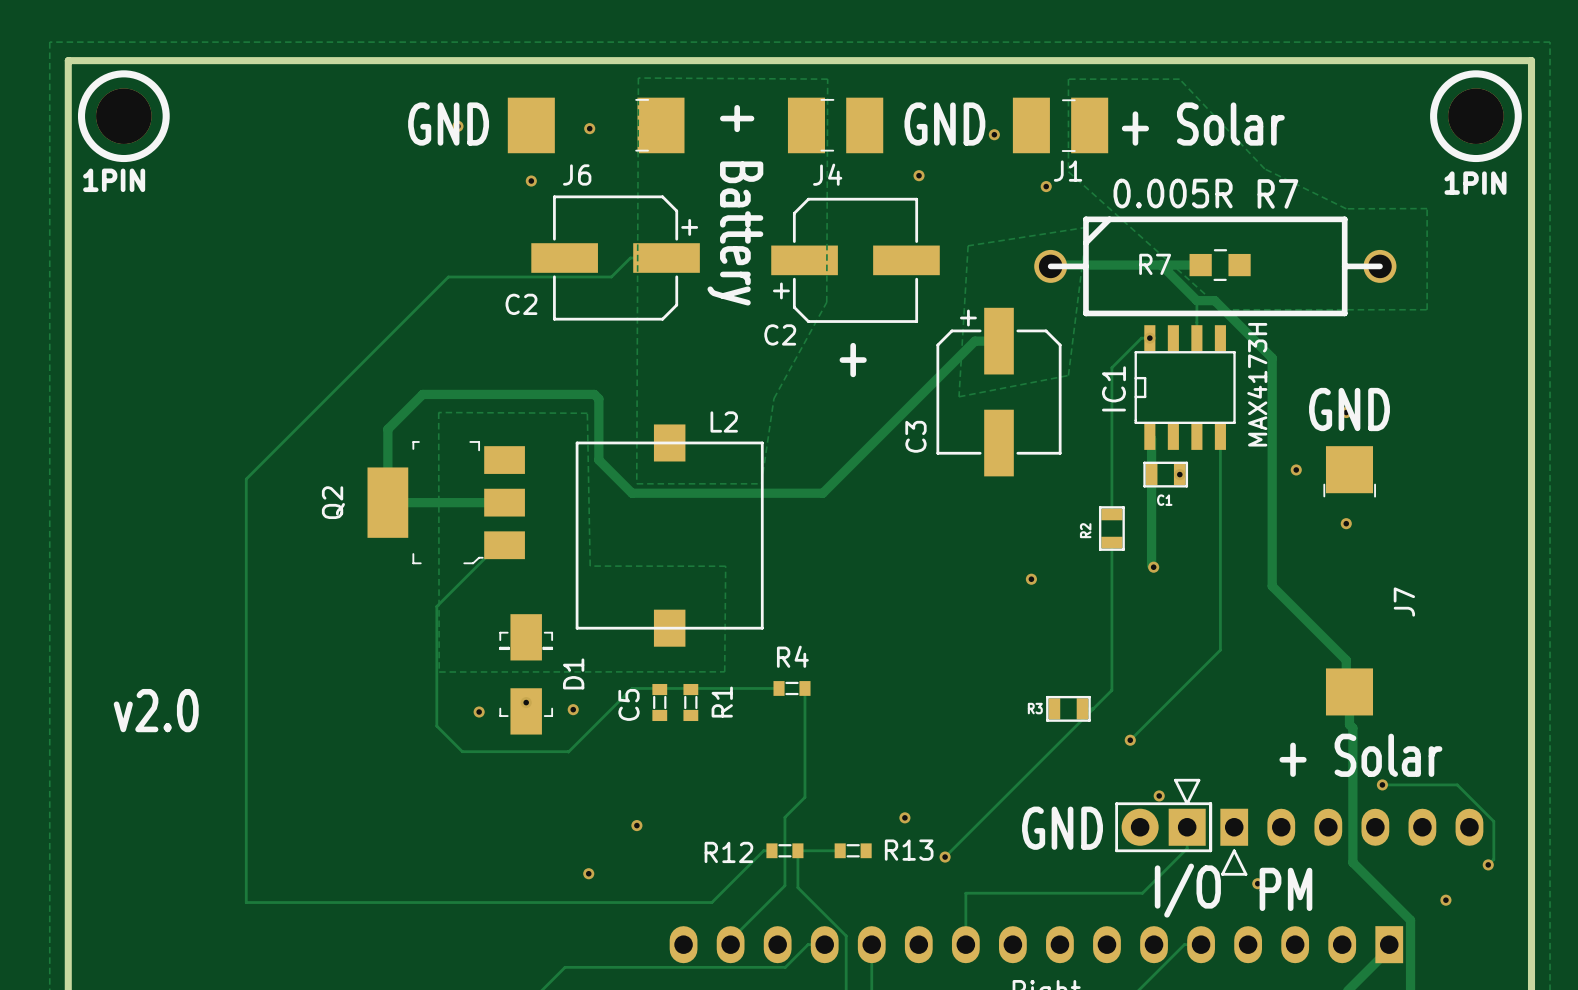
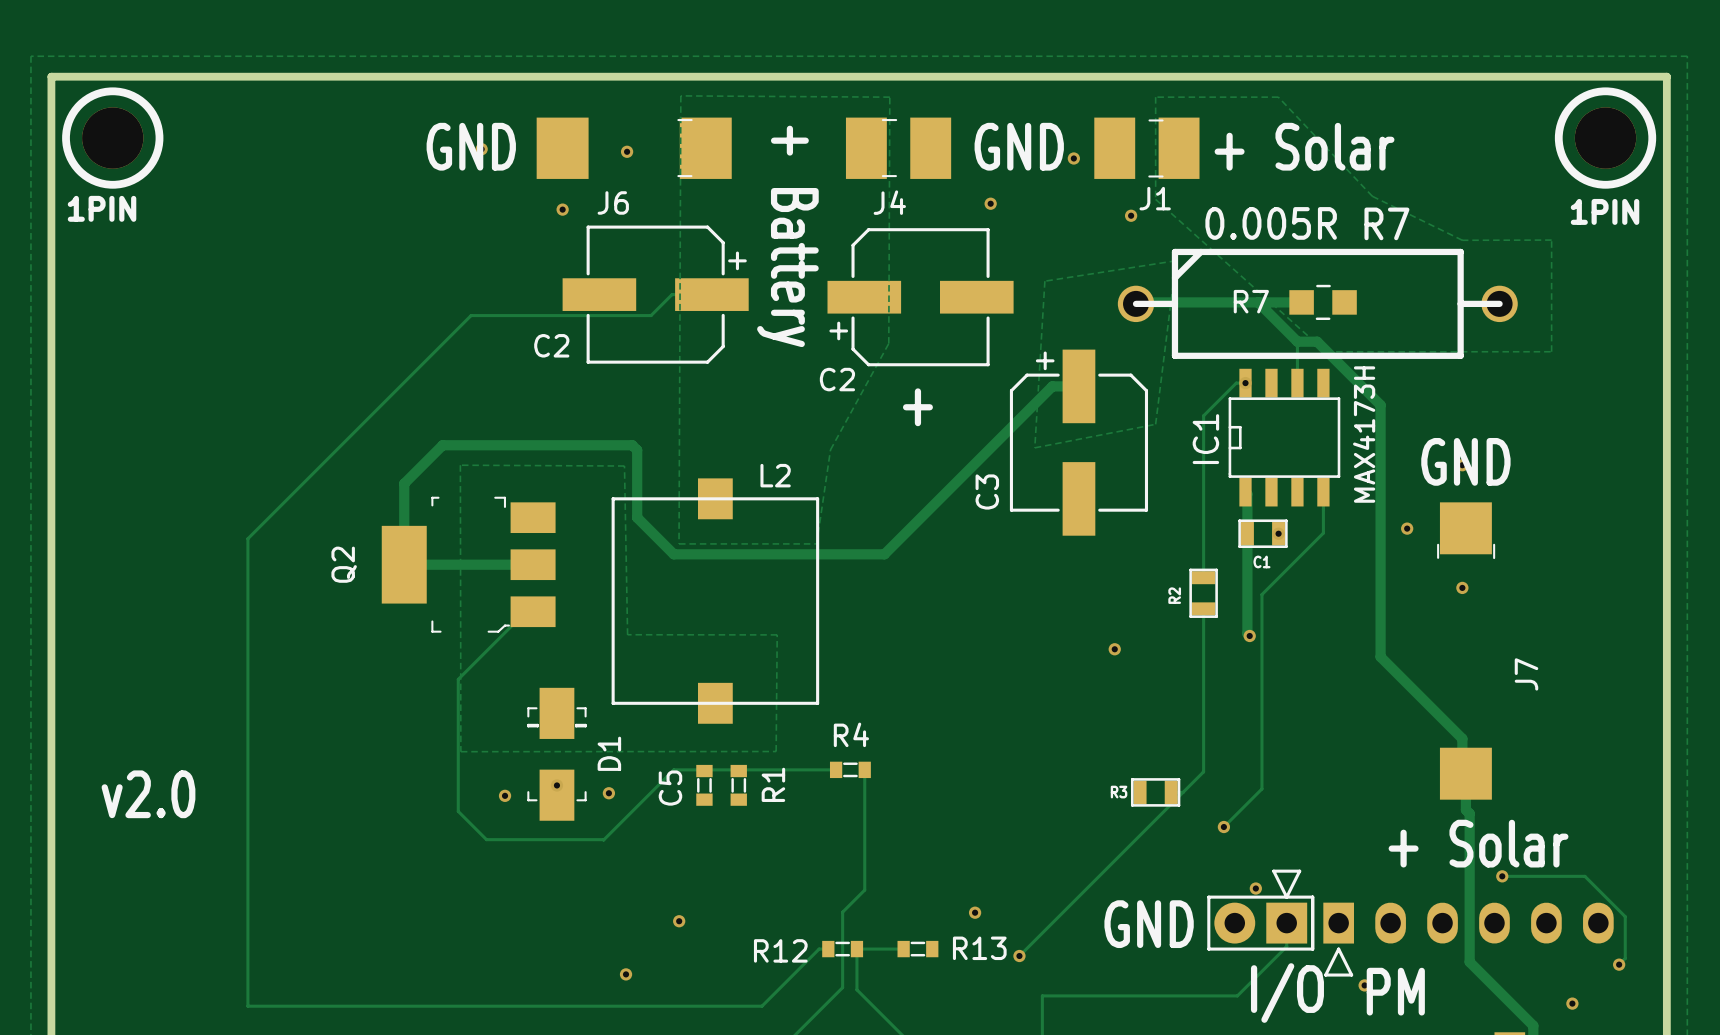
track: (1220, 474) (1220, 650) (1164, 705) -> (1323, 533) (1261, 594) (1261, 788)

